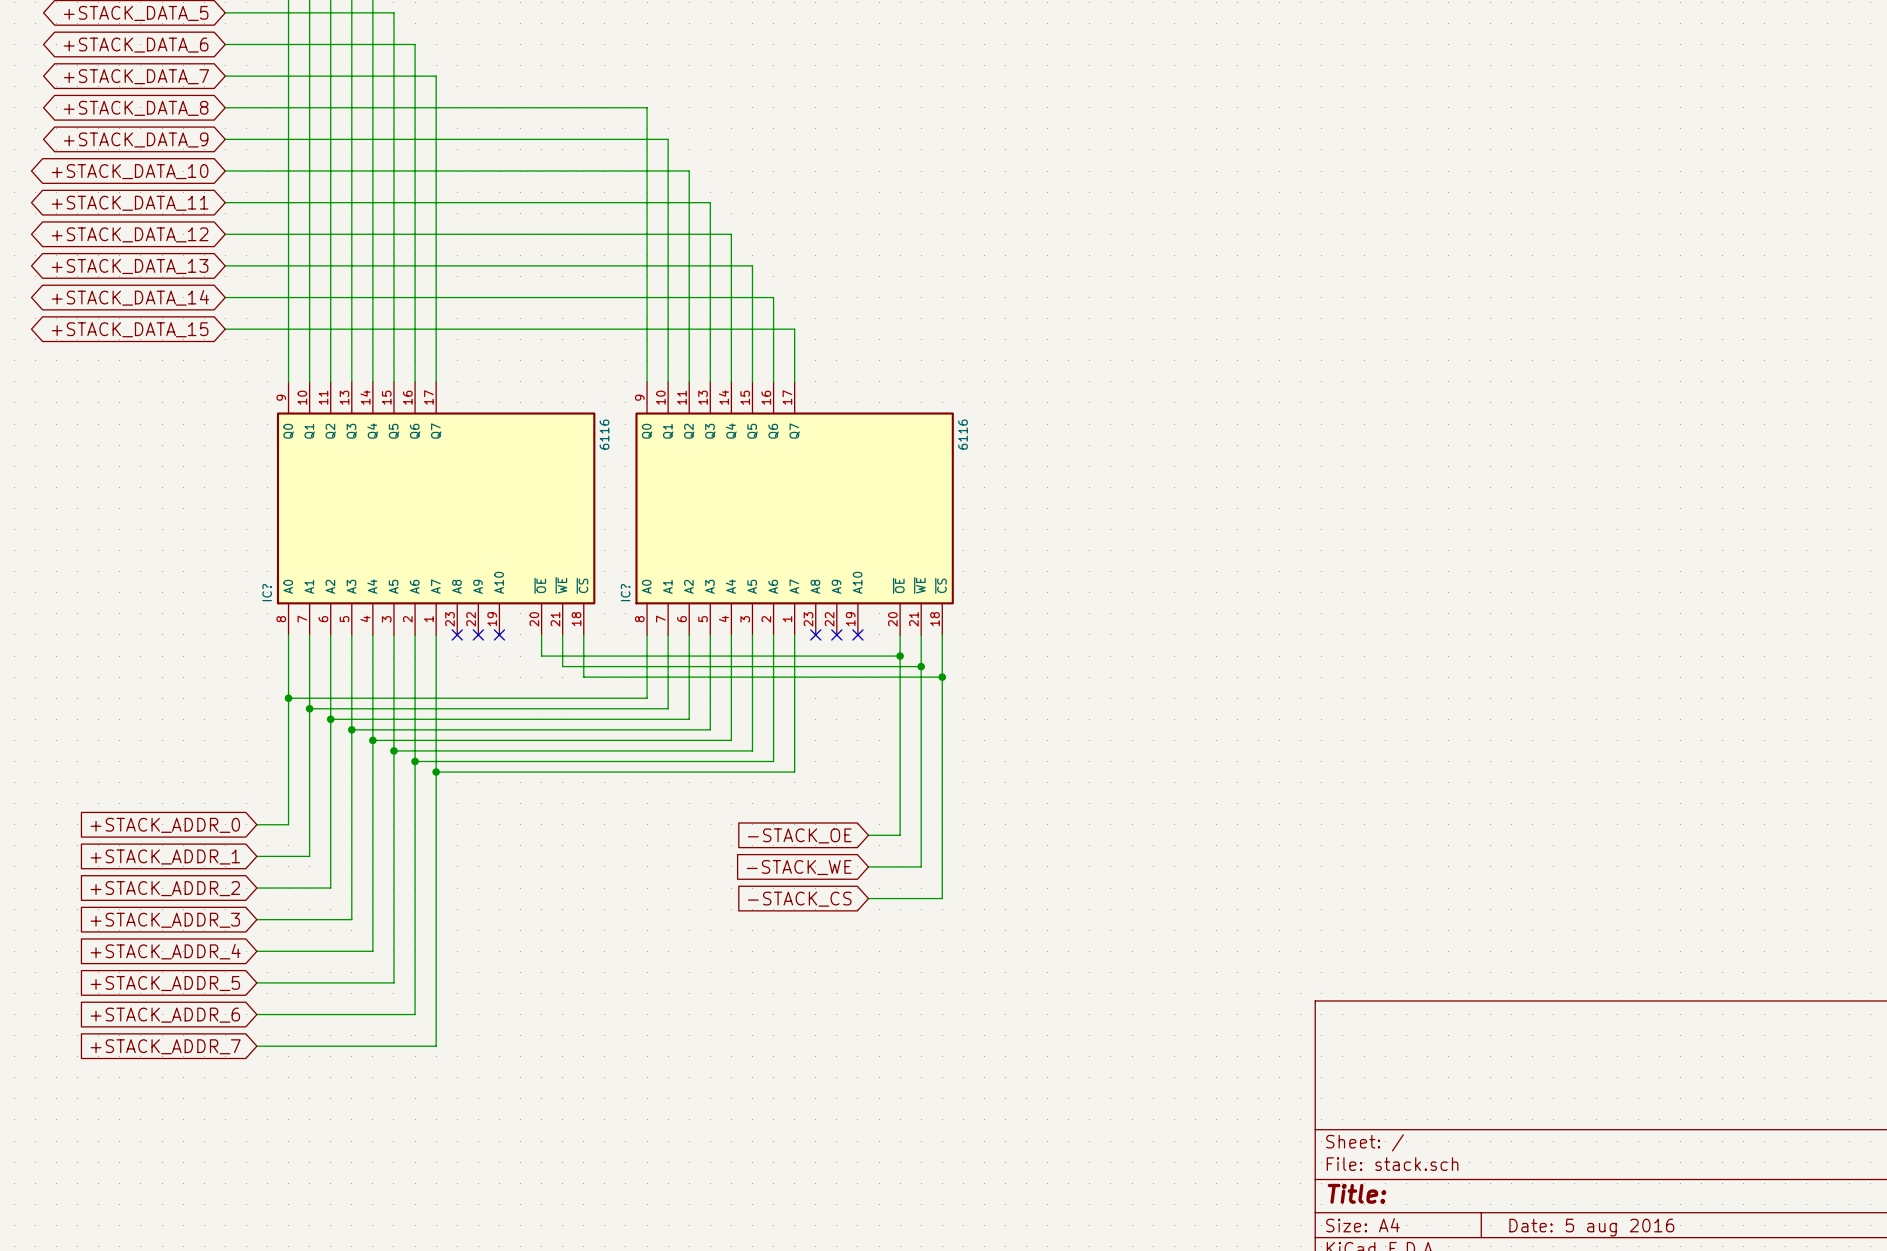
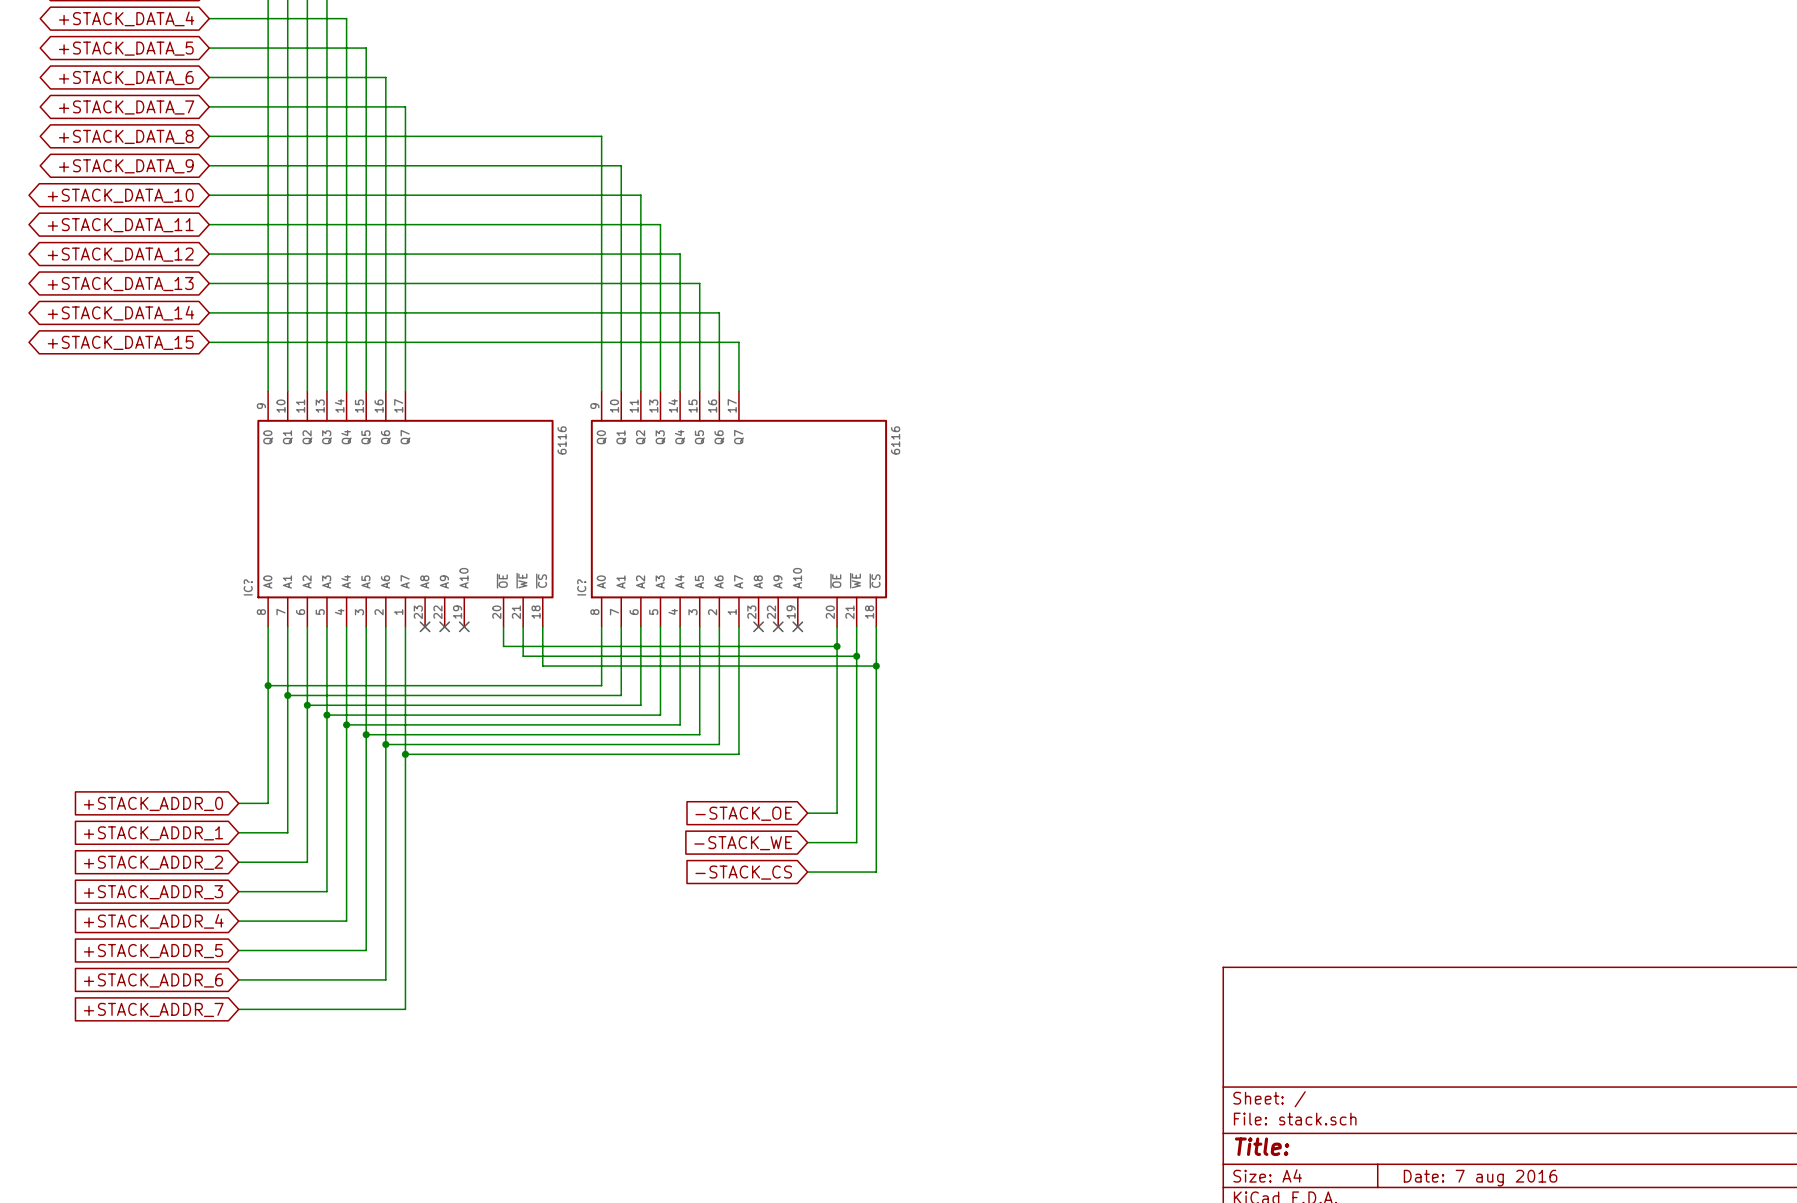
title block: Date: 5 aug 2016 (1591, 1227) -> Date: 7 aug 2016 (1480, 1178)

